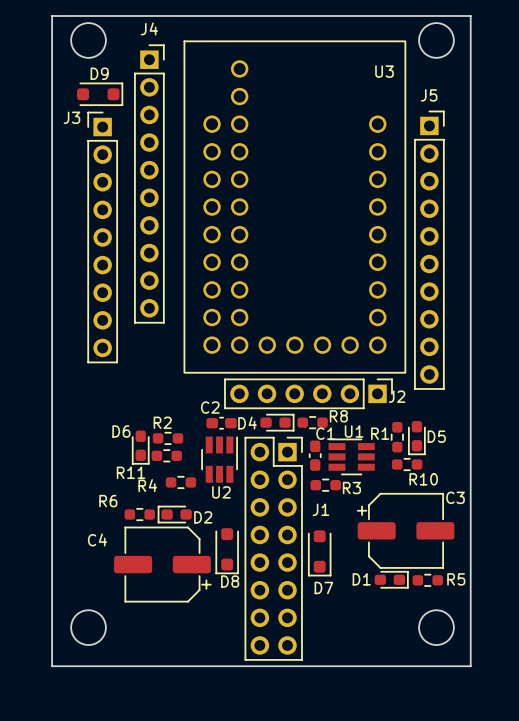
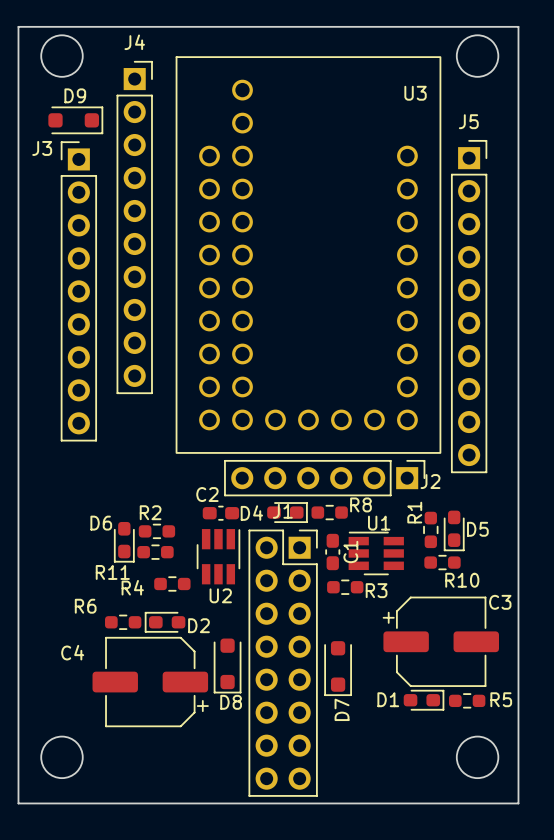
C1 name rotation: 0° (325, 433) -> 90° counterclockwise (350, 552)
R1 name rotation: 0° (380, 433) -> 90° counterclockwise (414, 512)
J1 name position: J1 (320, 509) -> J1 (282, 511)
D7 name rotation: 0° (323, 587) -> 90° counterclockwise (342, 709)

